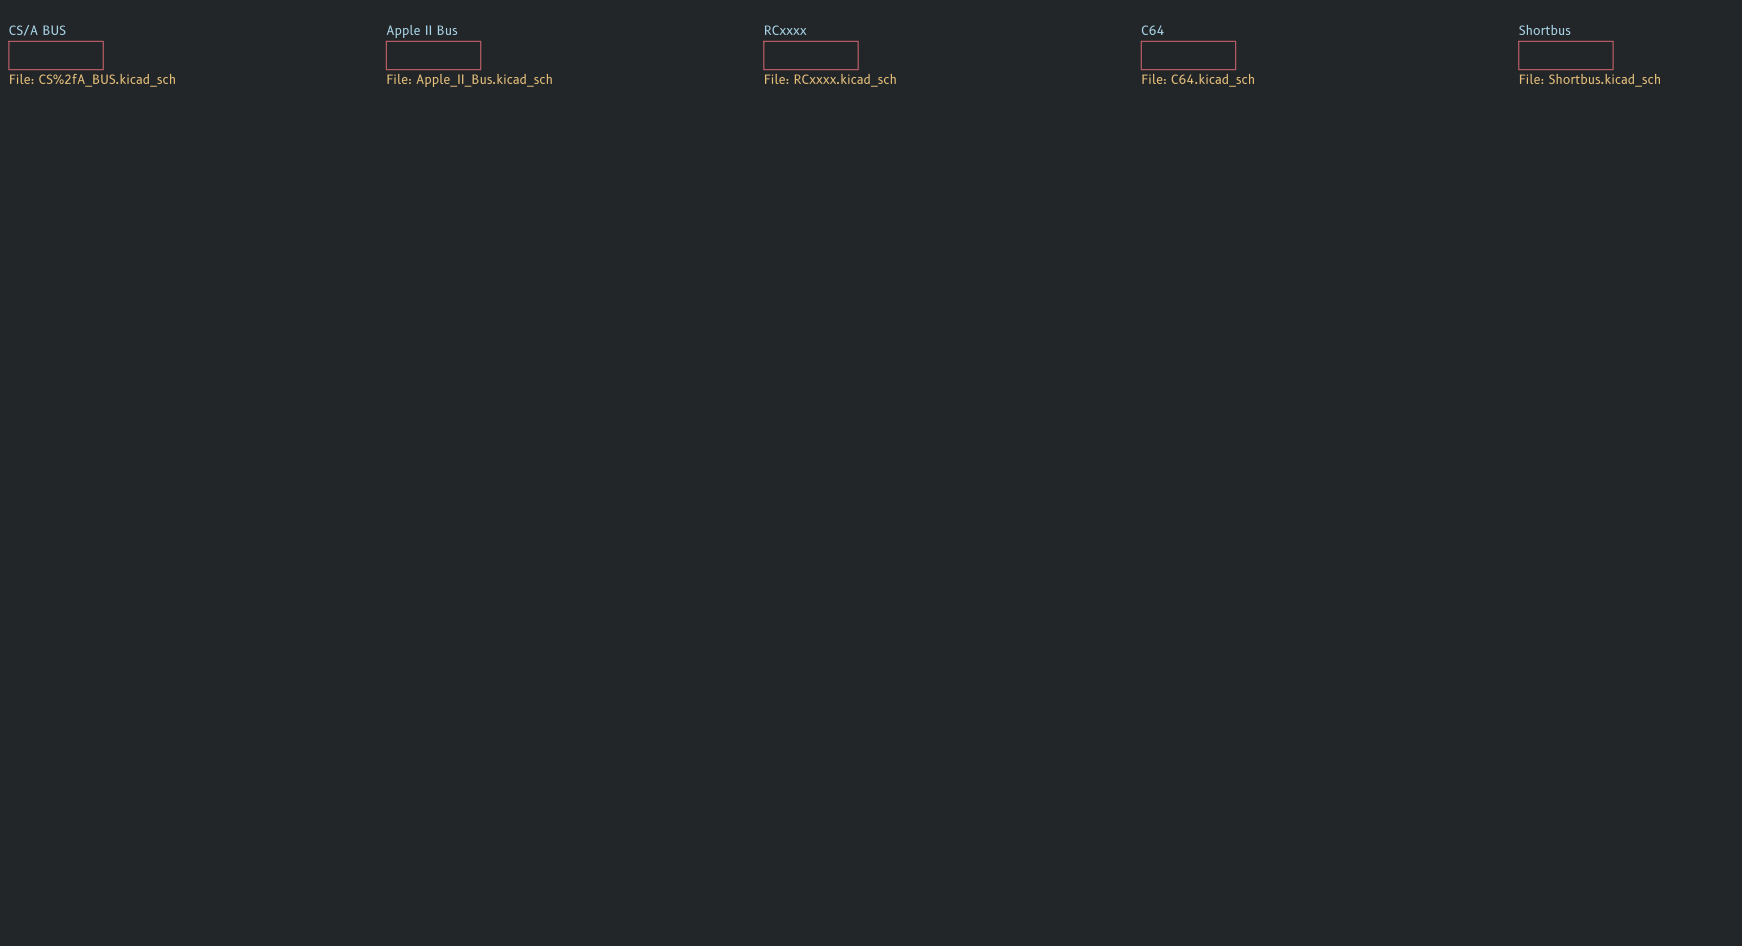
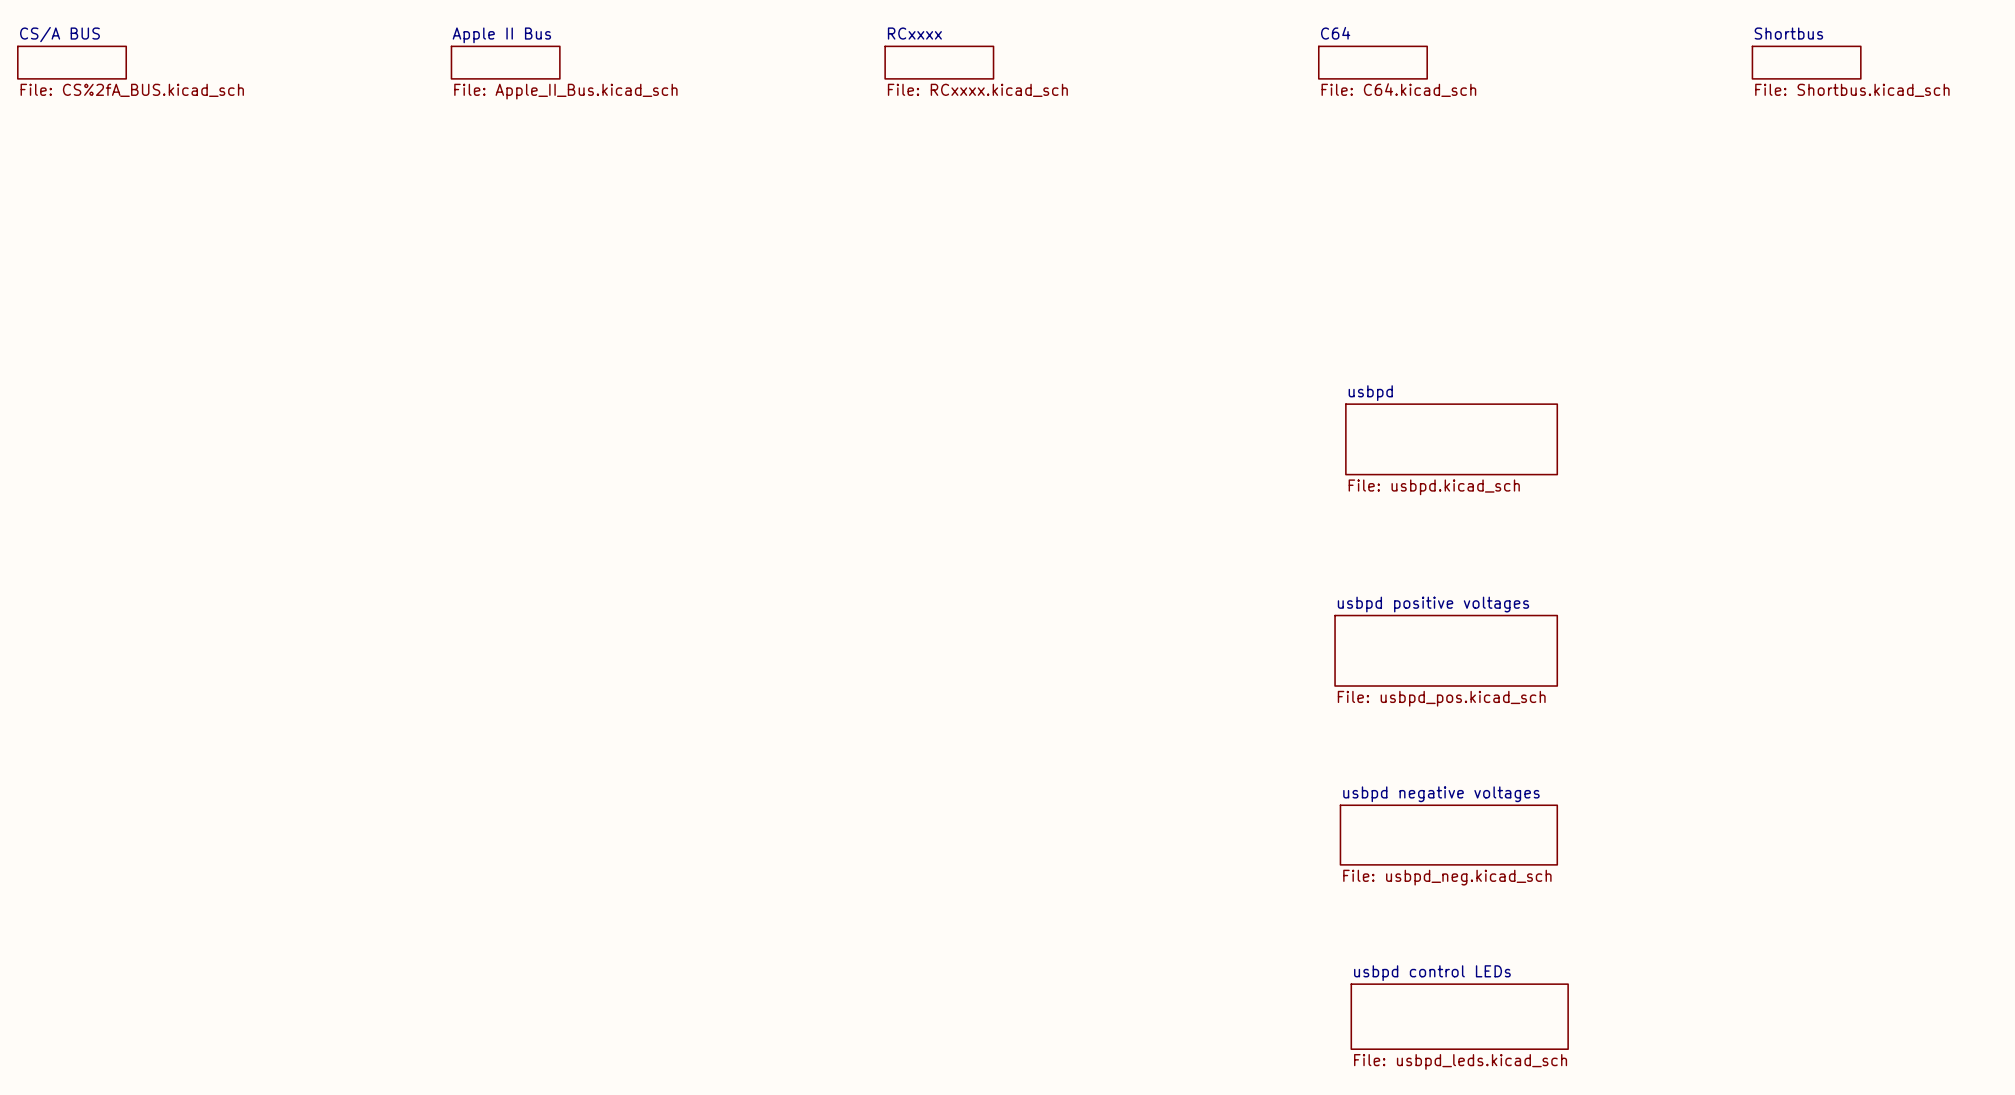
sheet usbpd: none -> File: usbpd.kicad_sch (1451, 439)
sheet usbpd positive voltages: none -> File: usbpd_pos.kicad_sch (1446, 650)
sheet usbpd negative voltages: none -> File: usbpd_neg.kicad_sch (1448, 835)
sheet usbpd control LEDs: none -> File: usbpd_leds.kicad_sch (1459, 1016)

